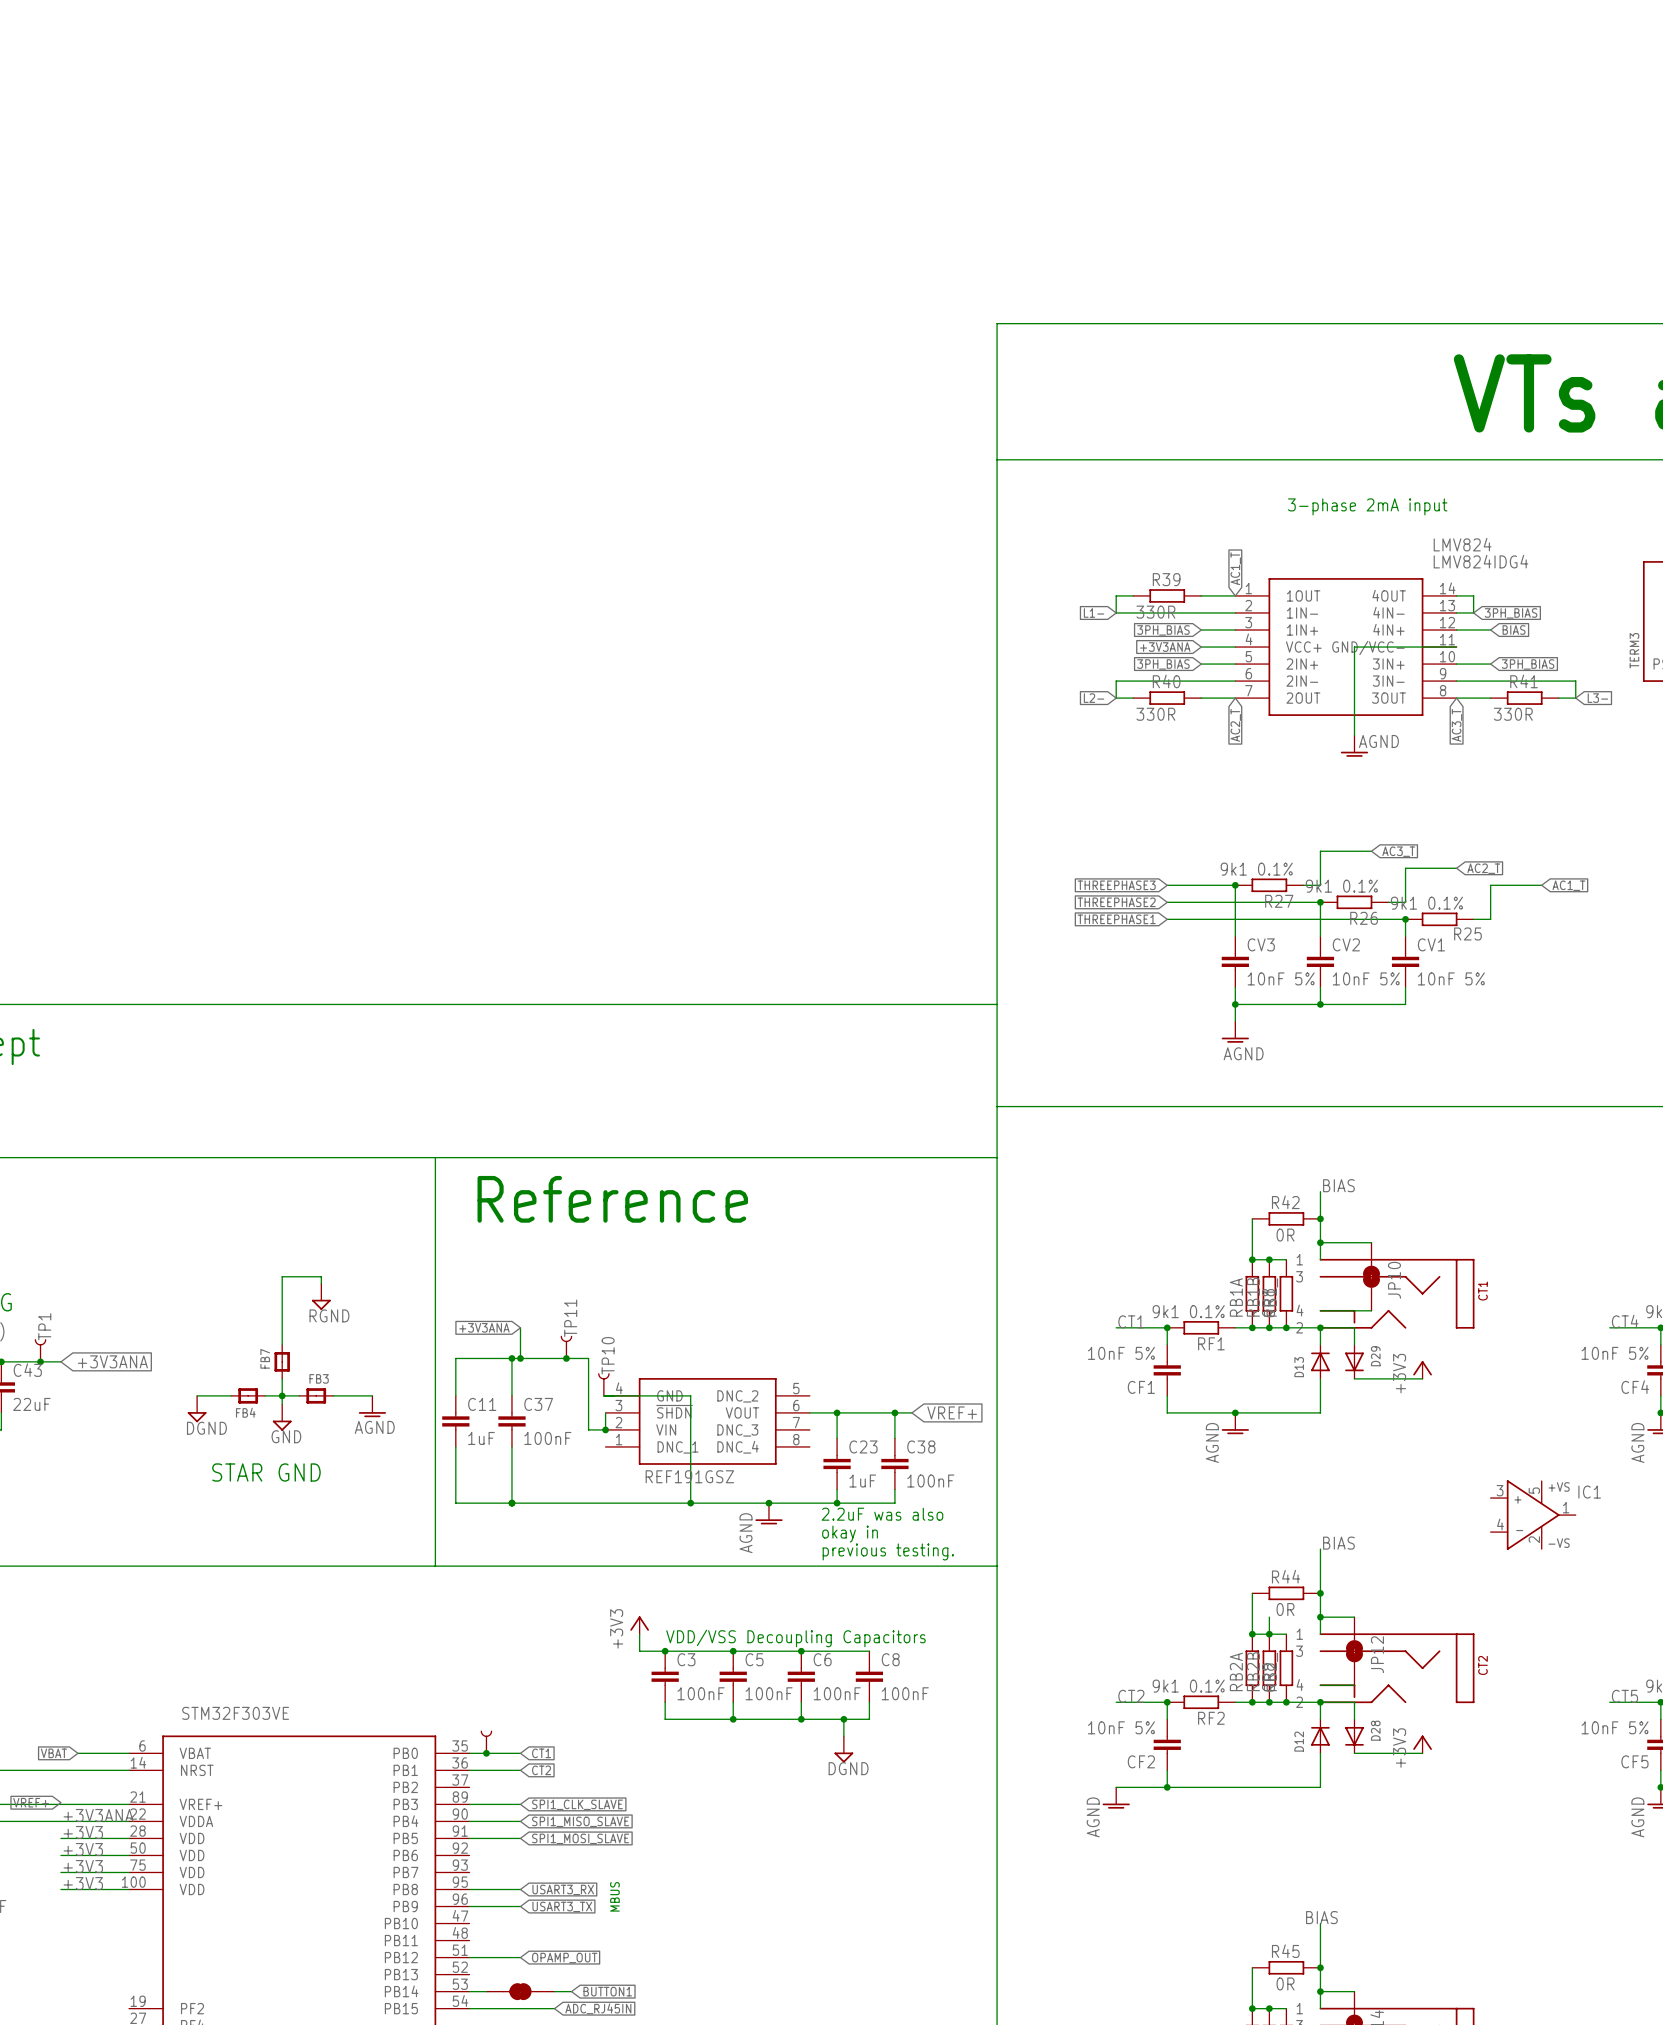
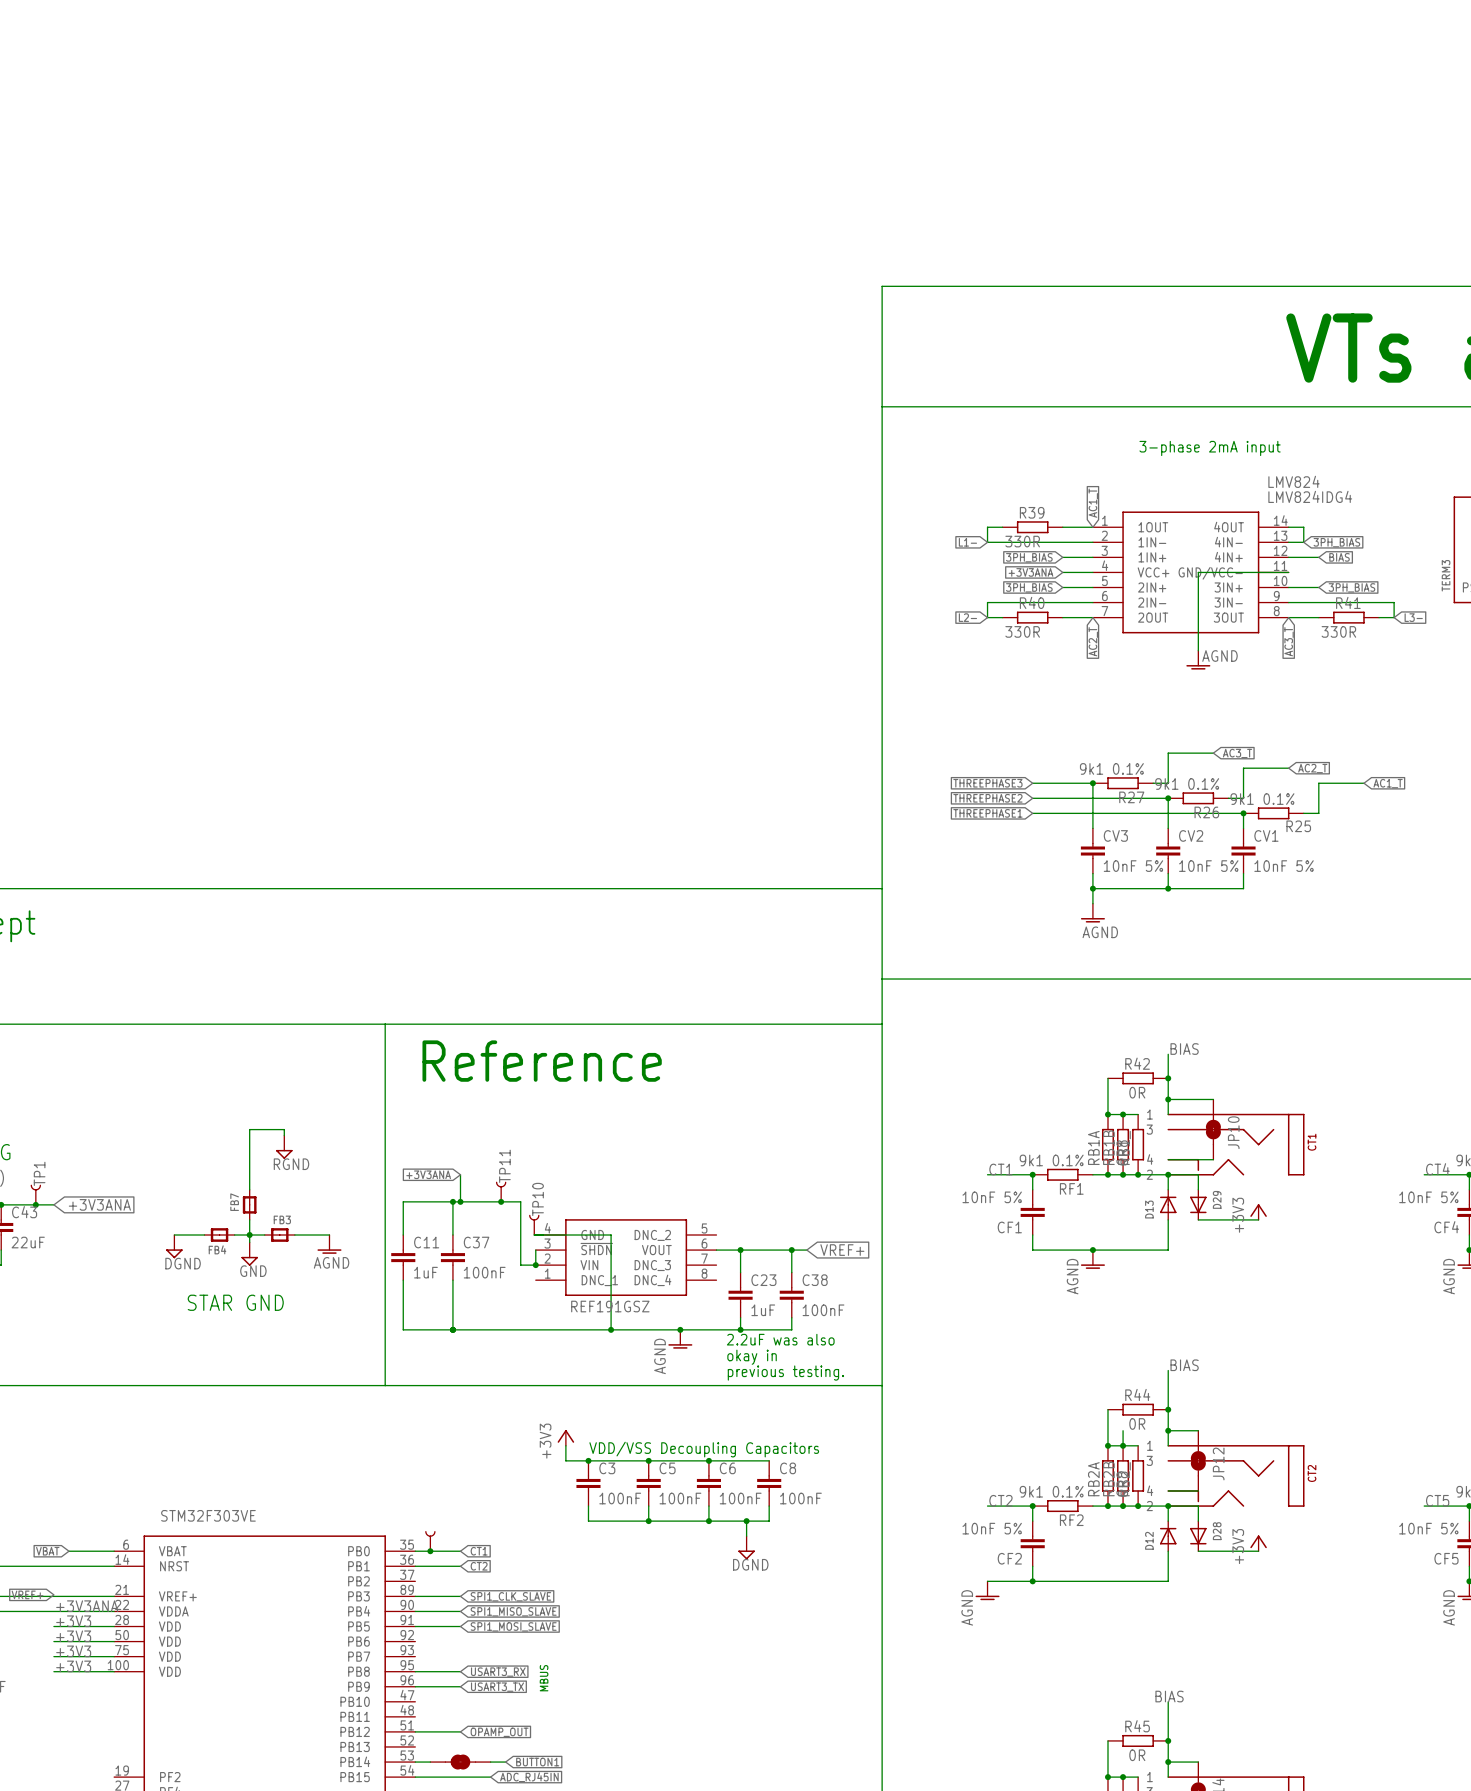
IC1: (1533, 1515) -> none

